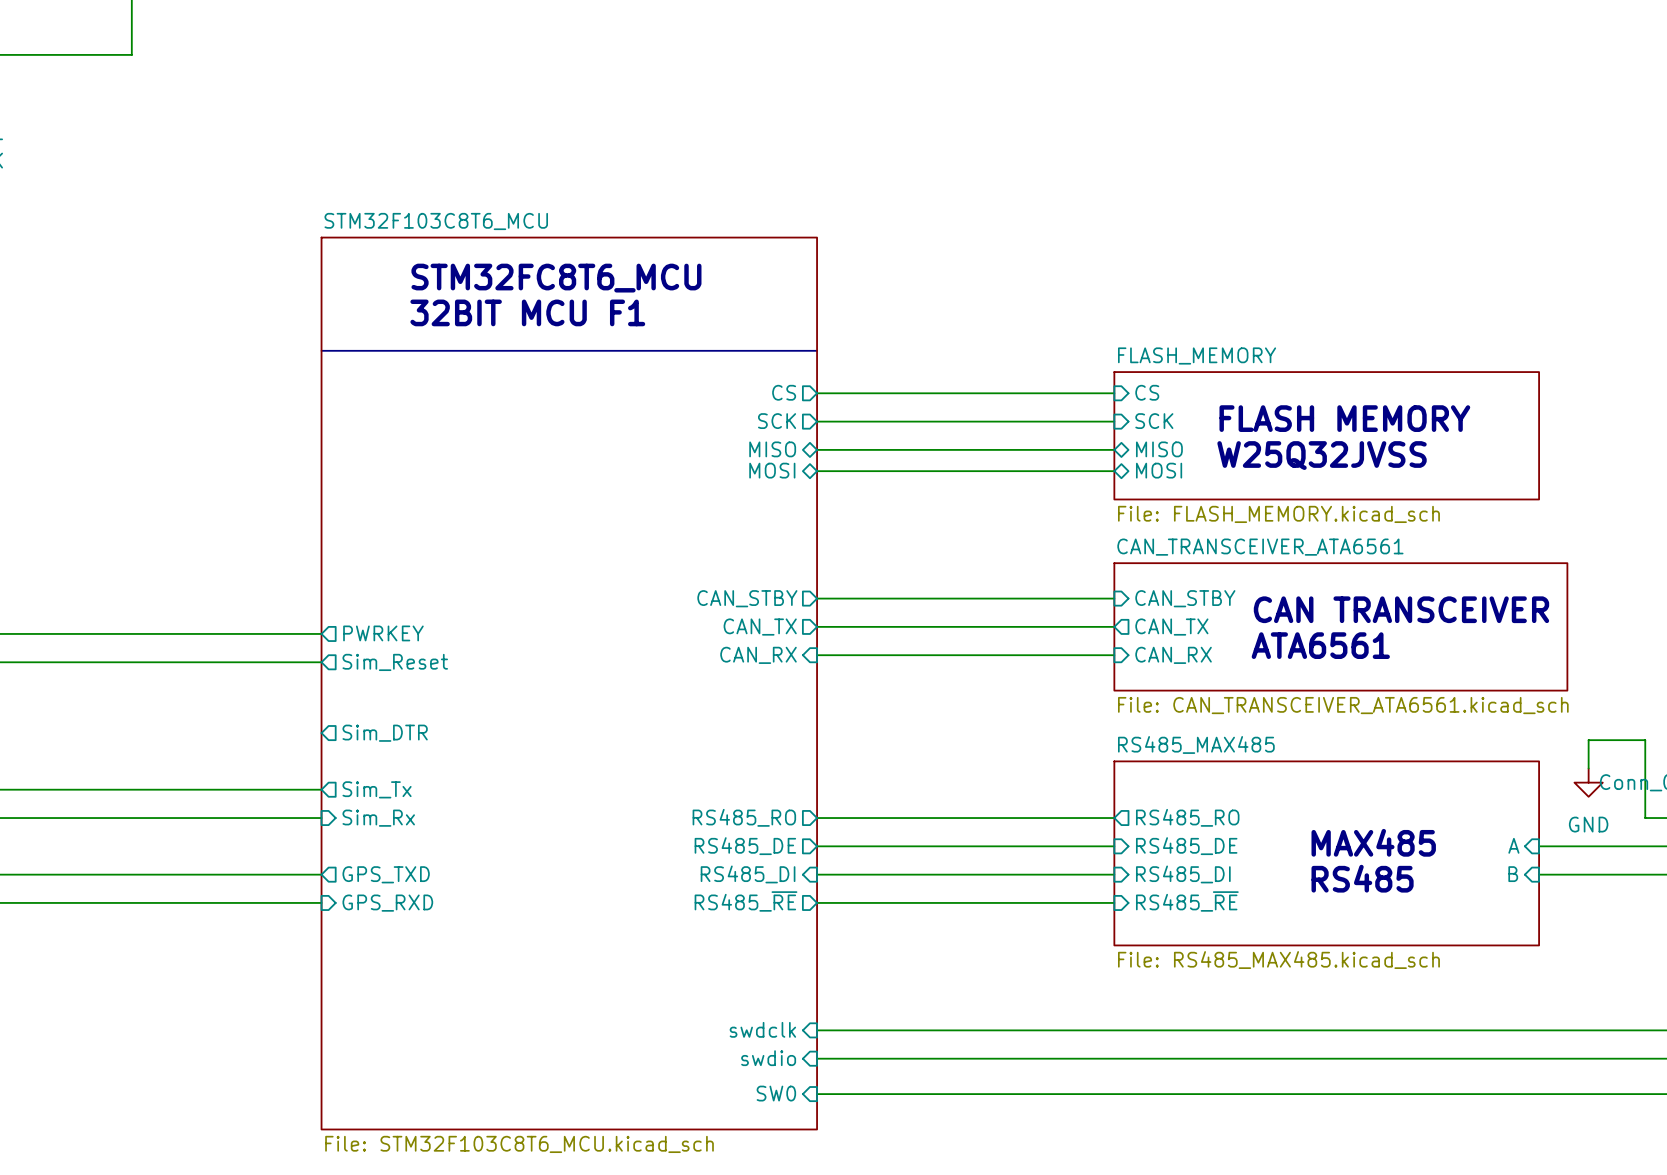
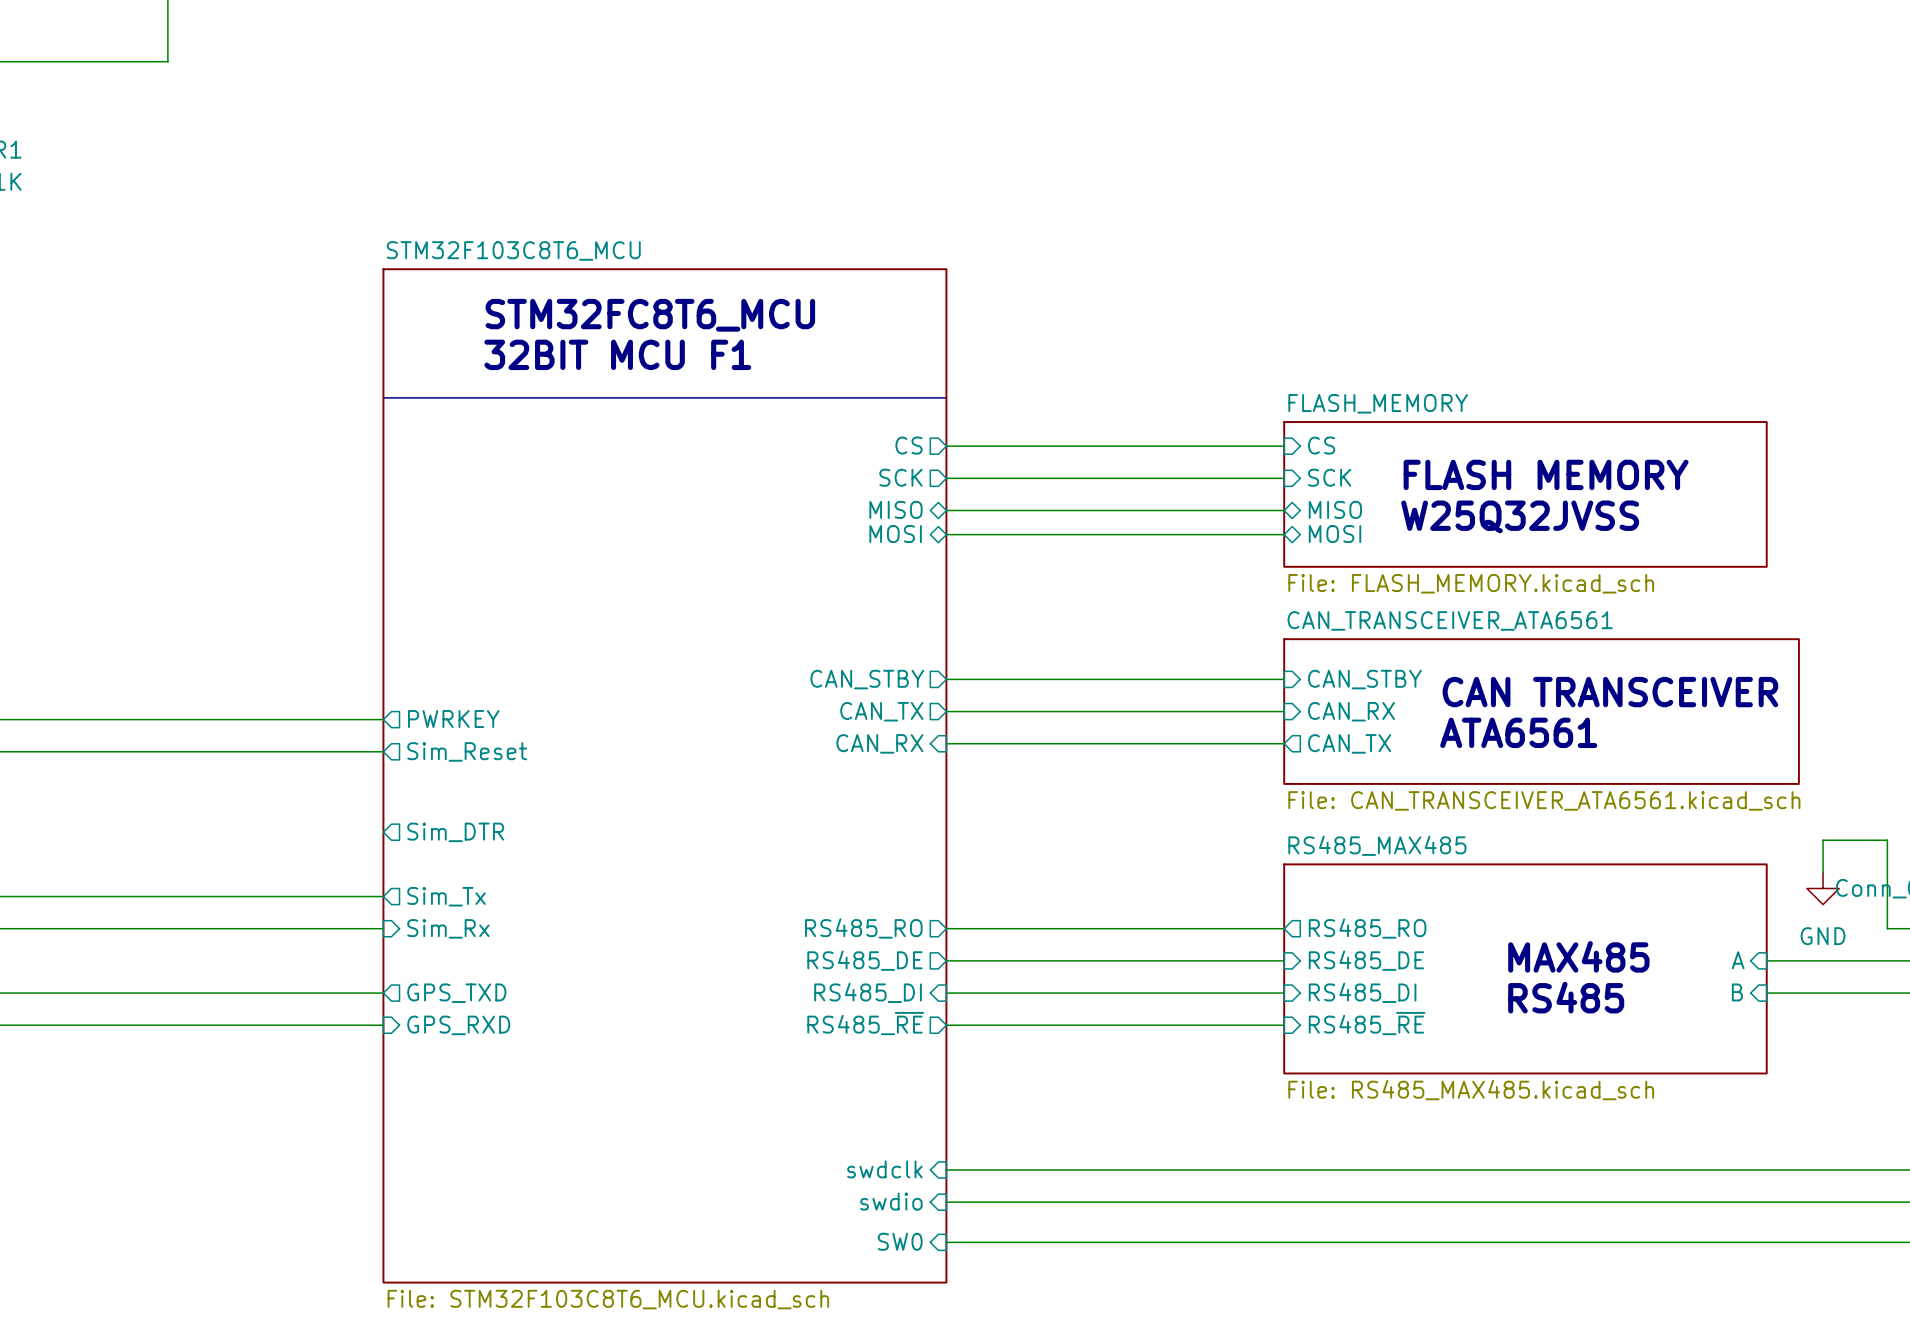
sheet pin shape: output (1171, 627) -> input (1351, 711)
sheet pin: CAN_TX (1171, 627) -> CAN_RX (1351, 711)
sheet pin shape: input (1173, 655) -> output (1349, 743)
sheet pin: CAN_RX (1173, 655) -> CAN_TX (1349, 743)

